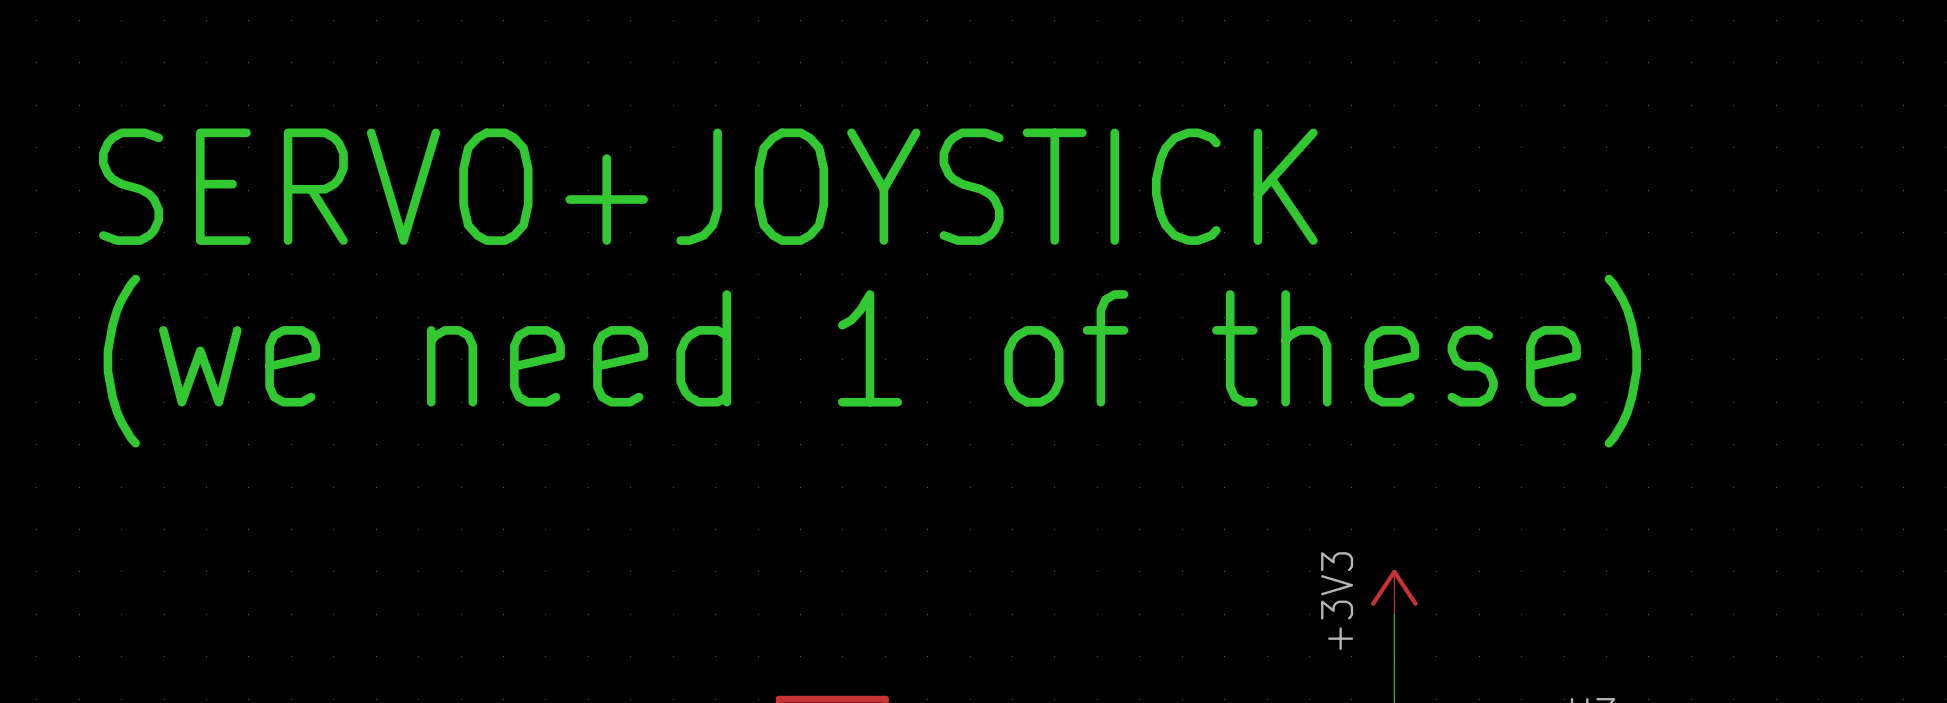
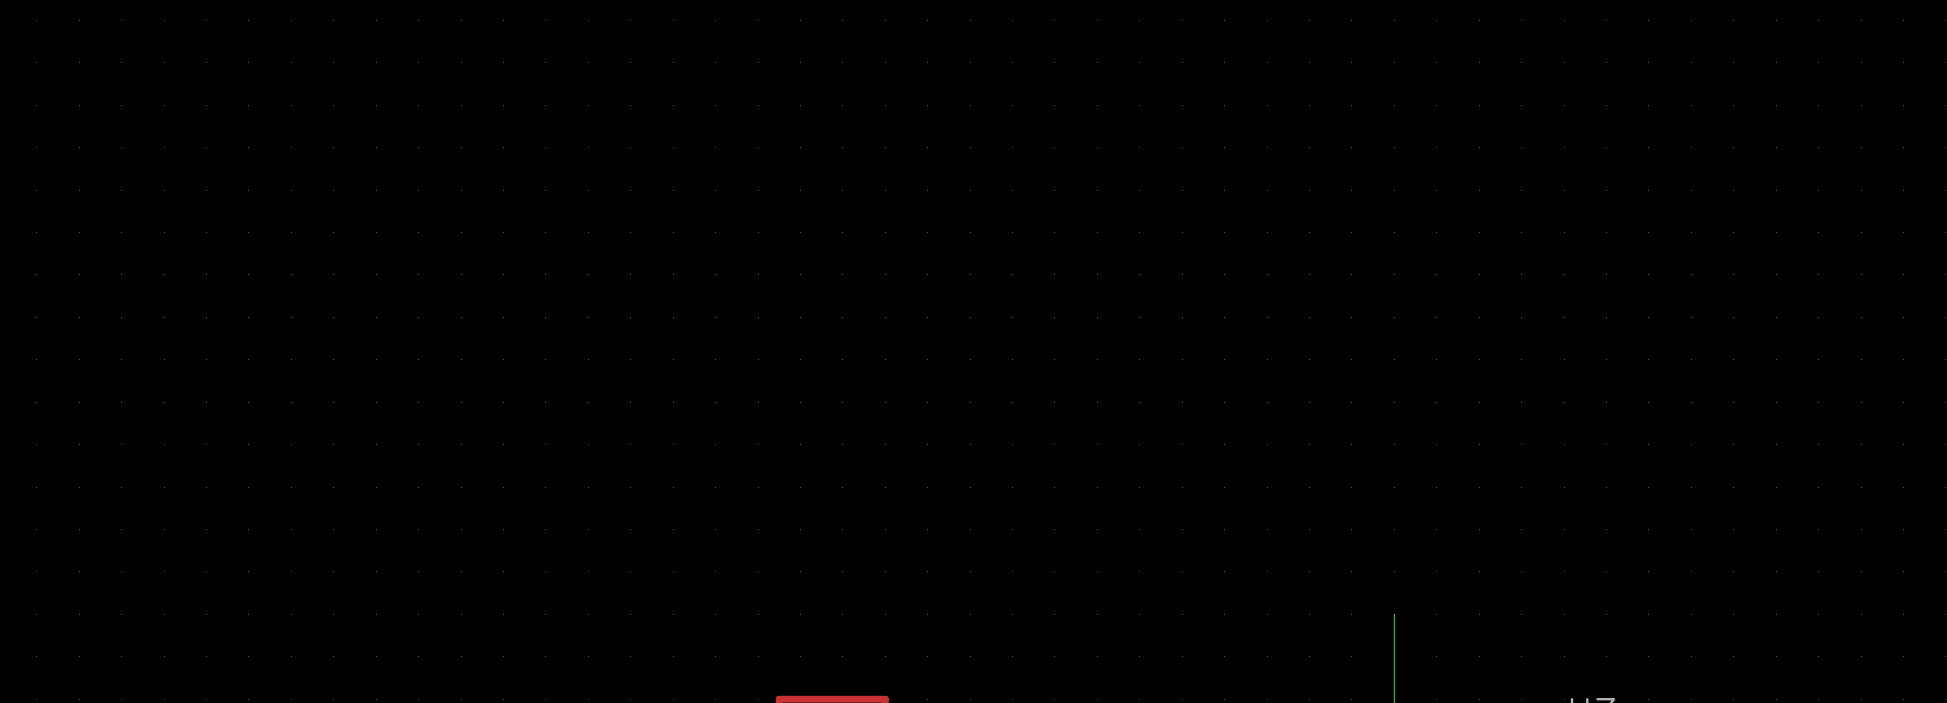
text: SERVO+JOYSTICK (708, 186) -> none
text: (we need 1 of these) (872, 361) -> none
power symbol: +3V3 (1394, 592) -> none

